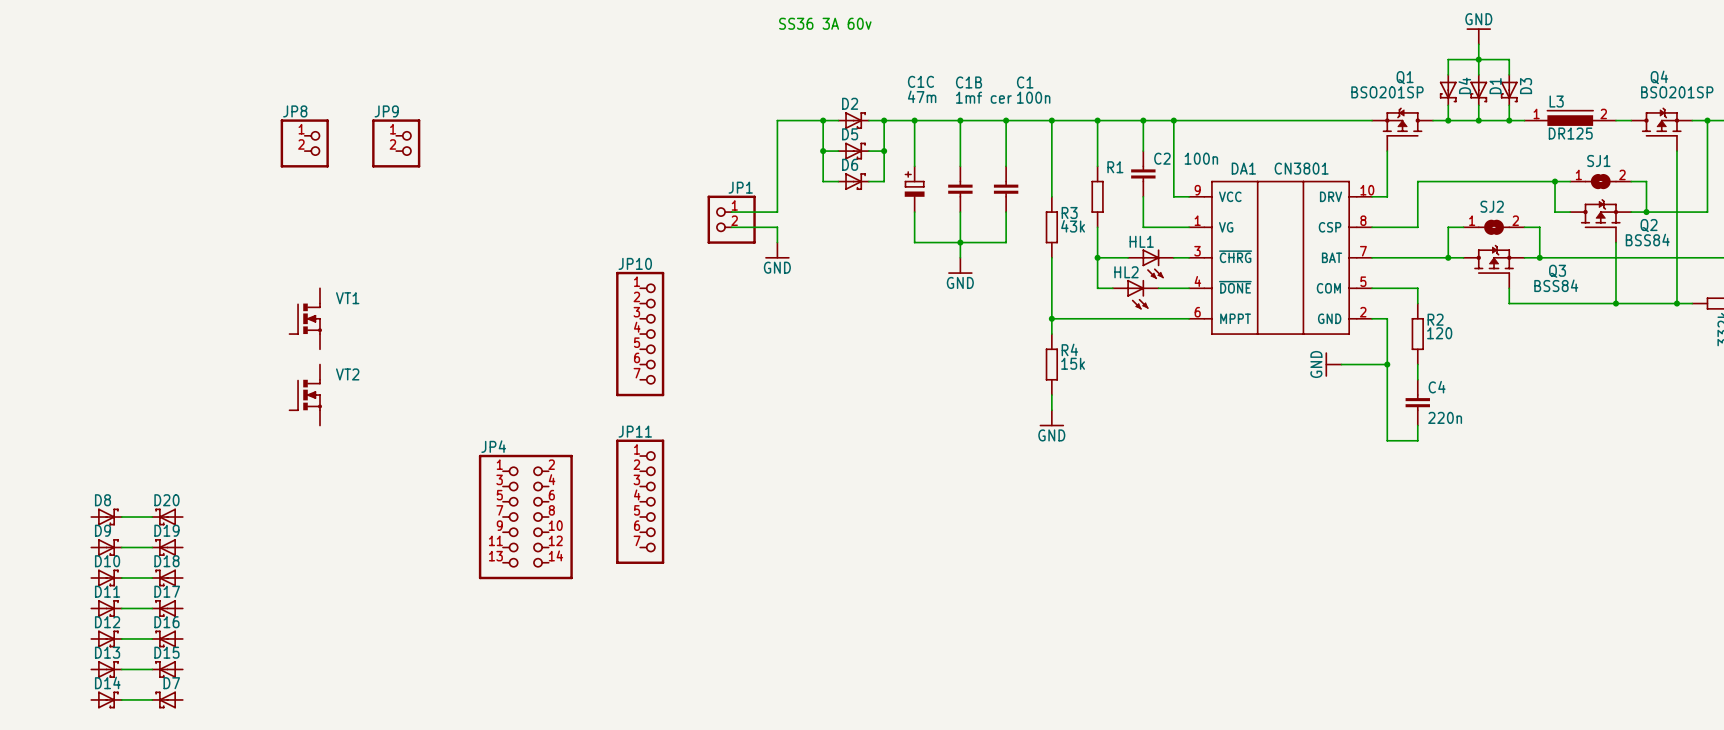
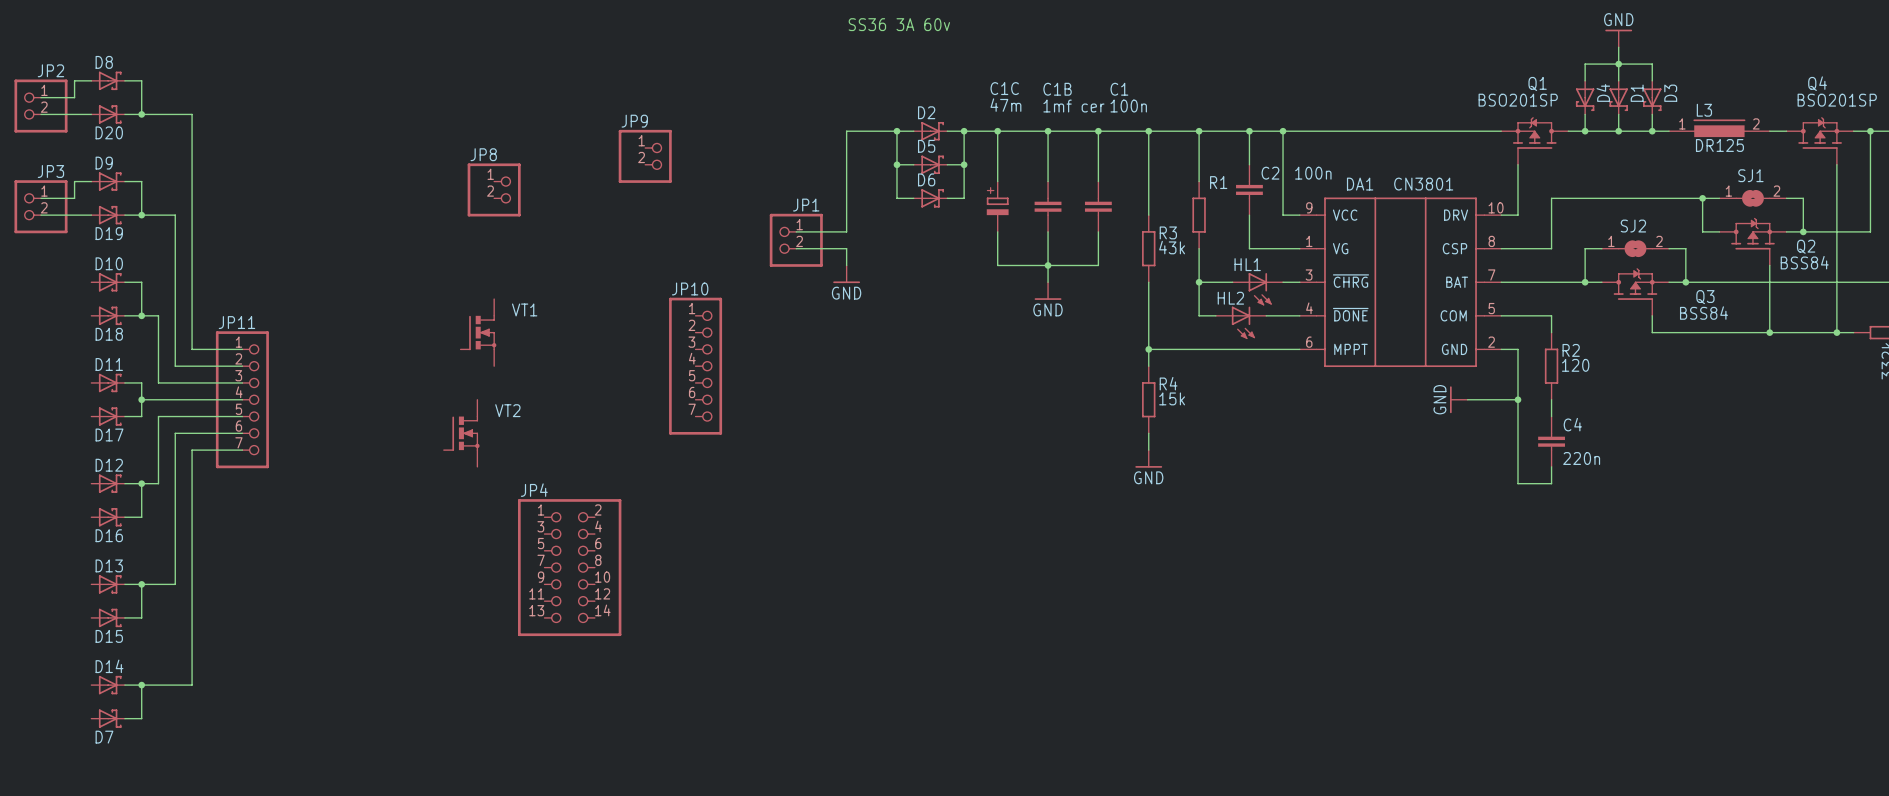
wire: none -> (91, 80) (74, 80) (74, 97) (40, 97)
wire: none -> (124, 80) (141, 80) (141, 114)
JP2: none -> (40, 106)
wire: none -> (40, 114) (91, 114)
wire: none -> (124, 114) (192, 114) (192, 349) (242, 349)
junction: none -> (141, 114)
JP8 position: (304, 143) -> (494, 189)
JP9 position: (396, 143) -> (645, 156)
wire: none -> (91, 181) (74, 181) (74, 198) (40, 198)
wire: none -> (124, 181) (141, 181) (141, 215)
JP3: none -> (40, 206)
wire: none -> (40, 215) (91, 215)
wire: none -> (124, 215) (175, 215) (175, 366) (242, 366)
junction: none -> (141, 215)
wire: none -> (124, 282) (141, 282) (141, 315)
wire: none -> (124, 315) (158, 315) (158, 382) (242, 382)
junction: none -> (141, 315)
VT1 position: (305, 318) -> (478, 332)
wire: none -> (124, 382) (141, 382) (141, 416) (124, 416)
wire: none -> (141, 399) (242, 399)
junction: none -> (141, 399)
wire: none -> (242, 416) (158, 416) (158, 483) (124, 483)
wire: none -> (242, 433) (175, 433) (175, 584) (124, 584)
VT2 position: (305, 395) -> (461, 433)
wire: none -> (242, 450) (192, 450) (192, 685) (124, 685)
wire: none -> (141, 483) (141, 517) (124, 517)
junction: none -> (141, 483)
JP11 position: (640, 501) -> (242, 399)
D8 position: (106, 517) -> (108, 80)
wire: (121, 517) (152, 517) -> none
D20 rotation: 0° (165, 517) -> 180° (110, 114)
D20 position: (167, 517) -> (108, 114)
wire: none -> (141, 584) (141, 617) (124, 617)
junction: none -> (141, 584)
D9 position: (106, 547) -> (108, 181)
wire: (121, 547) (152, 547) -> none
D19 rotation: 0° (165, 547) -> 180° (110, 215)
D19 position: (167, 547) -> (108, 215)
D10 position: (106, 577) -> (108, 282)
wire: (121, 577) (152, 577) -> none
D18 rotation: 0° (165, 577) -> 180° (110, 315)
D18 position: (167, 577) -> (108, 315)
D11 position: (106, 608) -> (108, 382)
wire: (121, 608) (152, 608) -> none
D17 rotation: 0° (165, 608) -> 180° (110, 416)
D17 position: (167, 608) -> (108, 416)
wire: none -> (141, 685) (141, 718) (124, 718)
junction: none -> (141, 685)
D12 position: (106, 638) -> (108, 483)
wire: (121, 638) (152, 638) -> none
D16 rotation: 0° (165, 638) -> 180° (110, 517)
D16 position: (167, 638) -> (108, 517)
D13 position: (106, 669) -> (108, 584)
wire: (121, 669) (152, 669) -> none
D15 rotation: 0° (165, 669) -> 180° (110, 617)
D15 position: (167, 669) -> (108, 617)
D14 position: (106, 699) -> (108, 685)
wire: (121, 699) (152, 699) -> none
D7 rotation: 0° (165, 699) -> 180° (110, 718)
D7 position: (167, 699) -> (108, 718)

